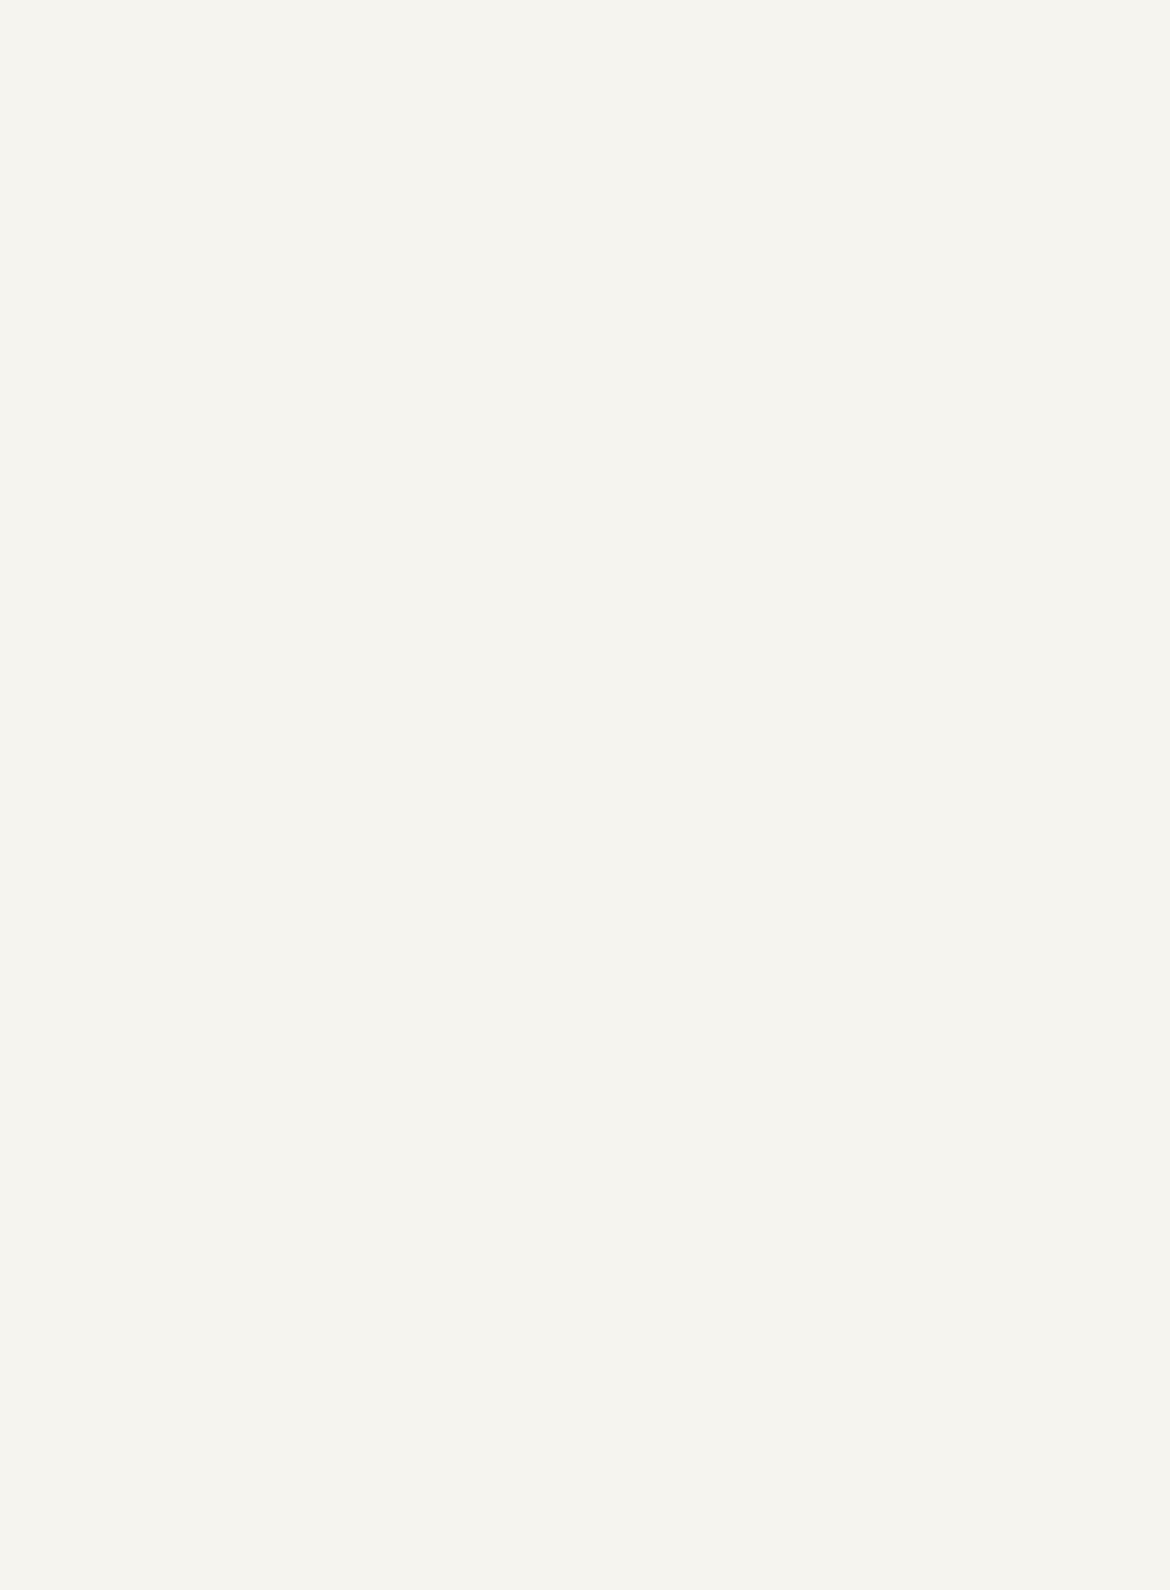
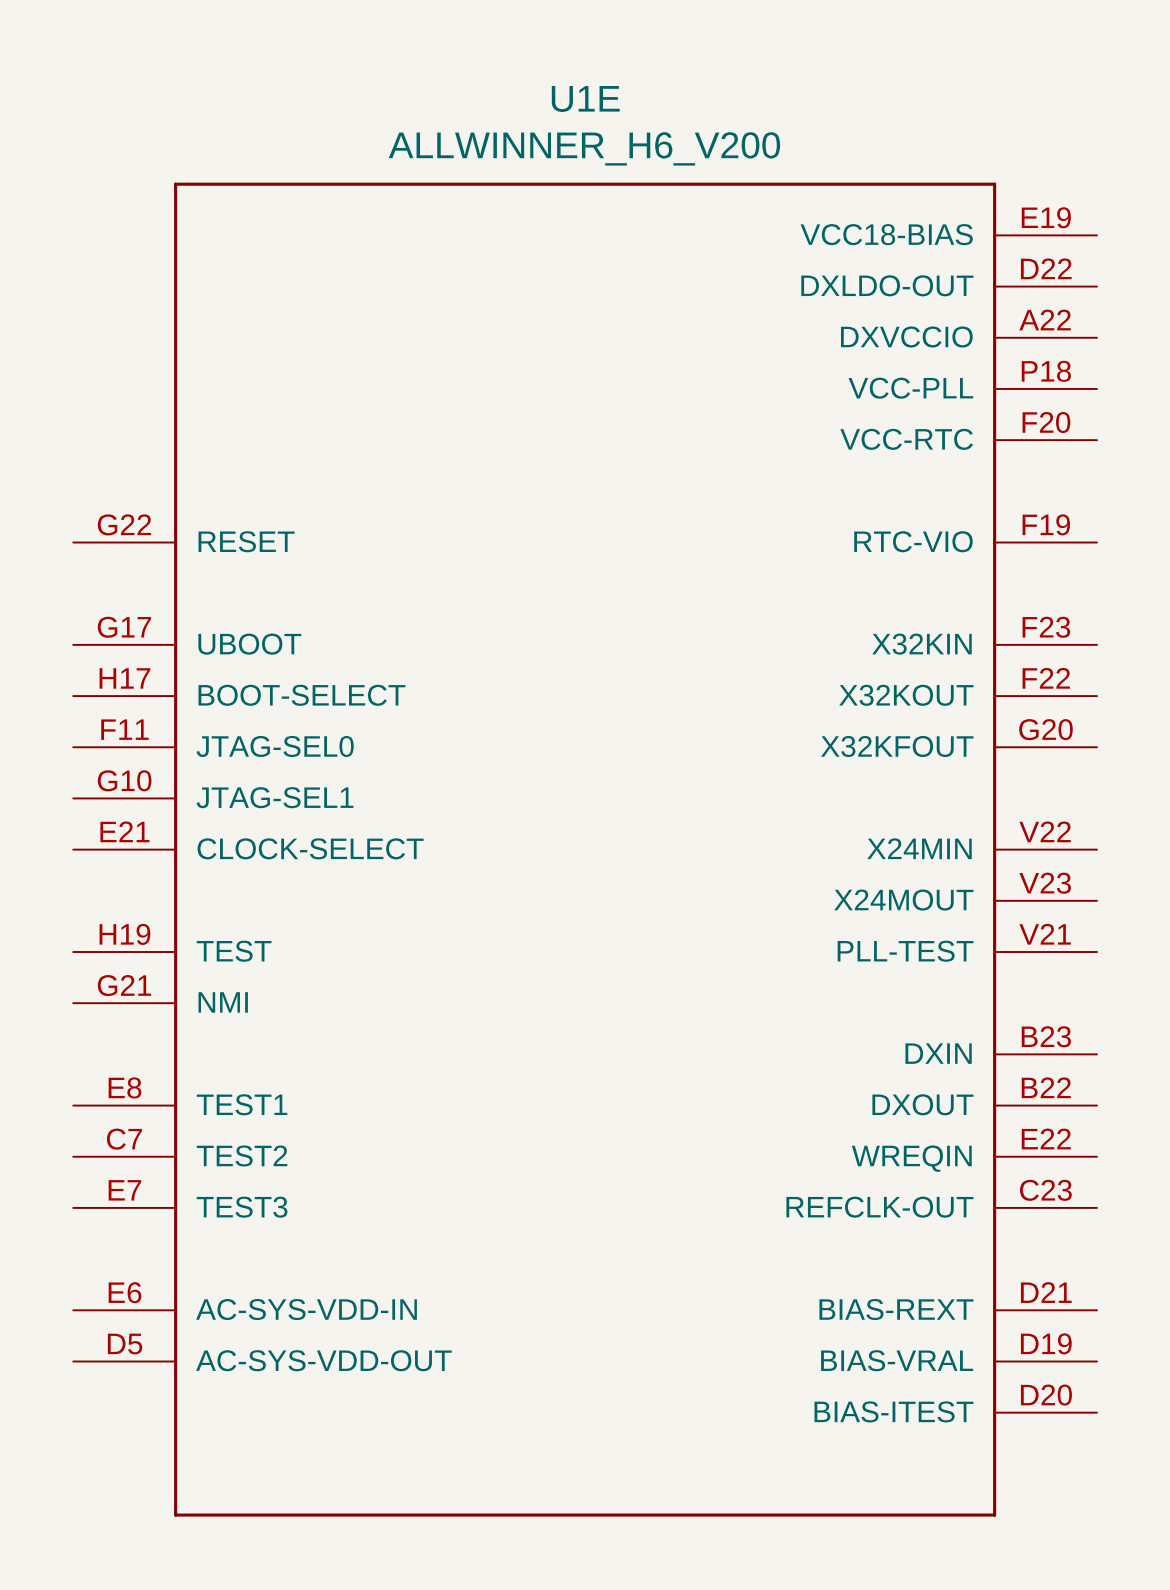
U1E: none -> ALLWINNER_H6_V200 (585, 849)

